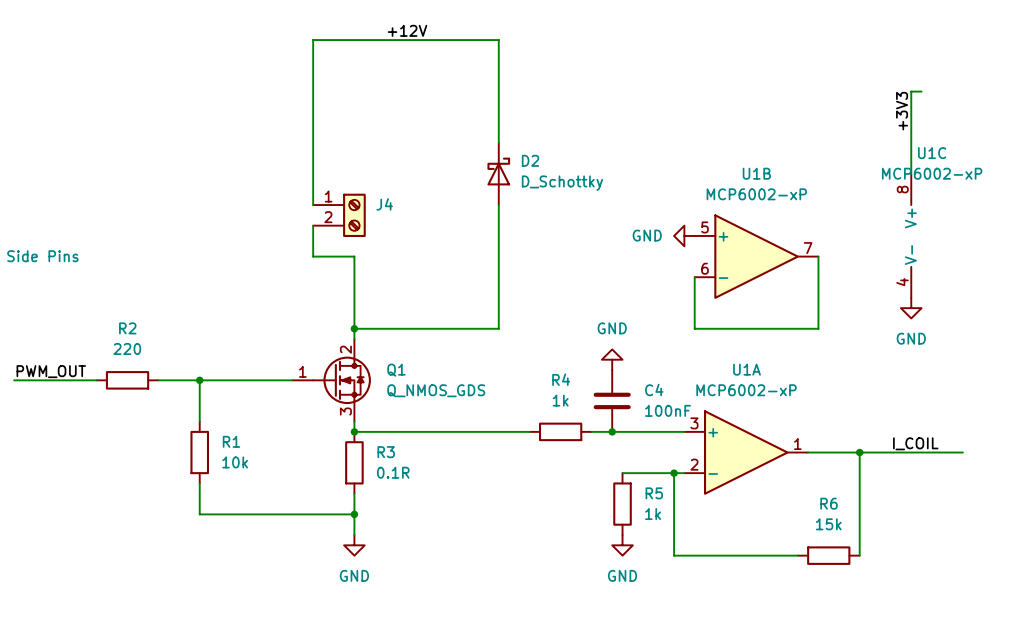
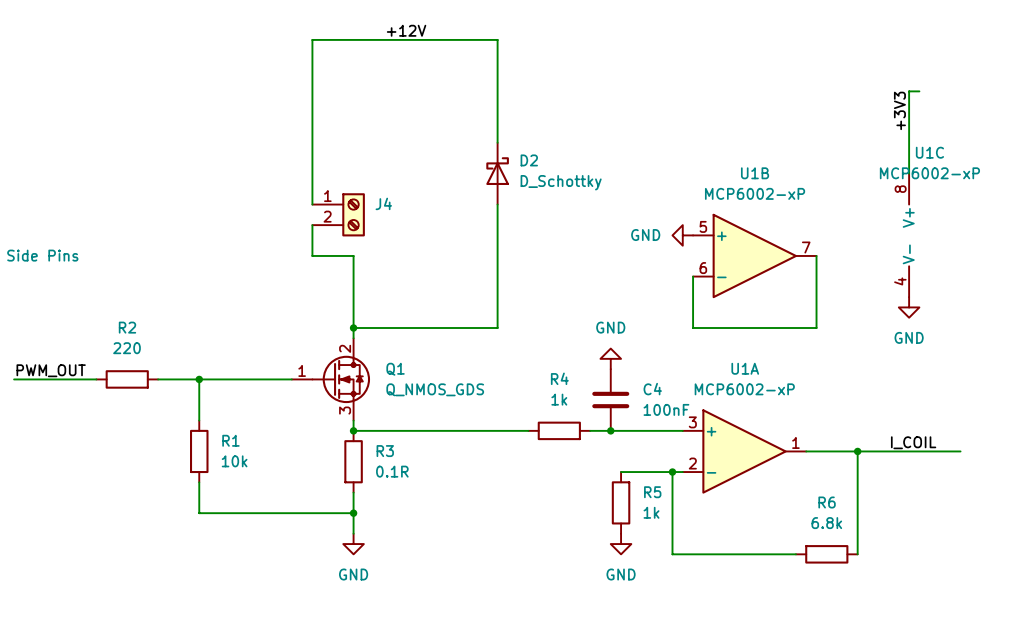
R6 value: 15k (828, 524) -> 6.8k (826, 523)

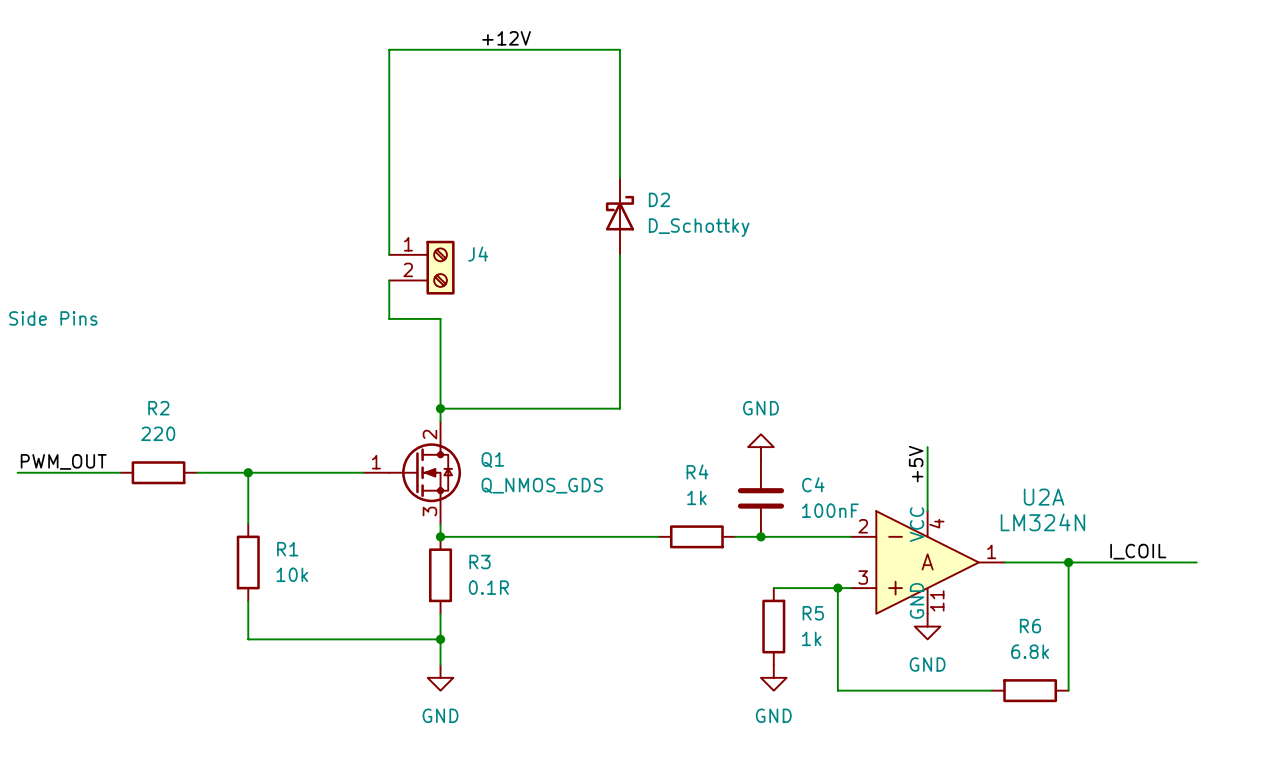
wire: (919, 91) (909, 91) (909, 173) -> none
label: +3V3 (899, 110) -> none
power symbol: GND (682, 235) -> none
U1C: MCP6002-xP (909, 235) -> none
U1B: MCP6002-xP (754, 255) -> none
wire: (816, 255) (816, 328) (693, 328) (693, 276) -> none
power symbol: GND (909, 307) -> none
wire: none -> (927, 447) (927, 511)
label: none -> +5V (916, 464)
U1A: MCP6002-xP (744, 451) -> none
U2A: none -> LM324N (927, 562)
power symbol: none -> GND (927, 626)

